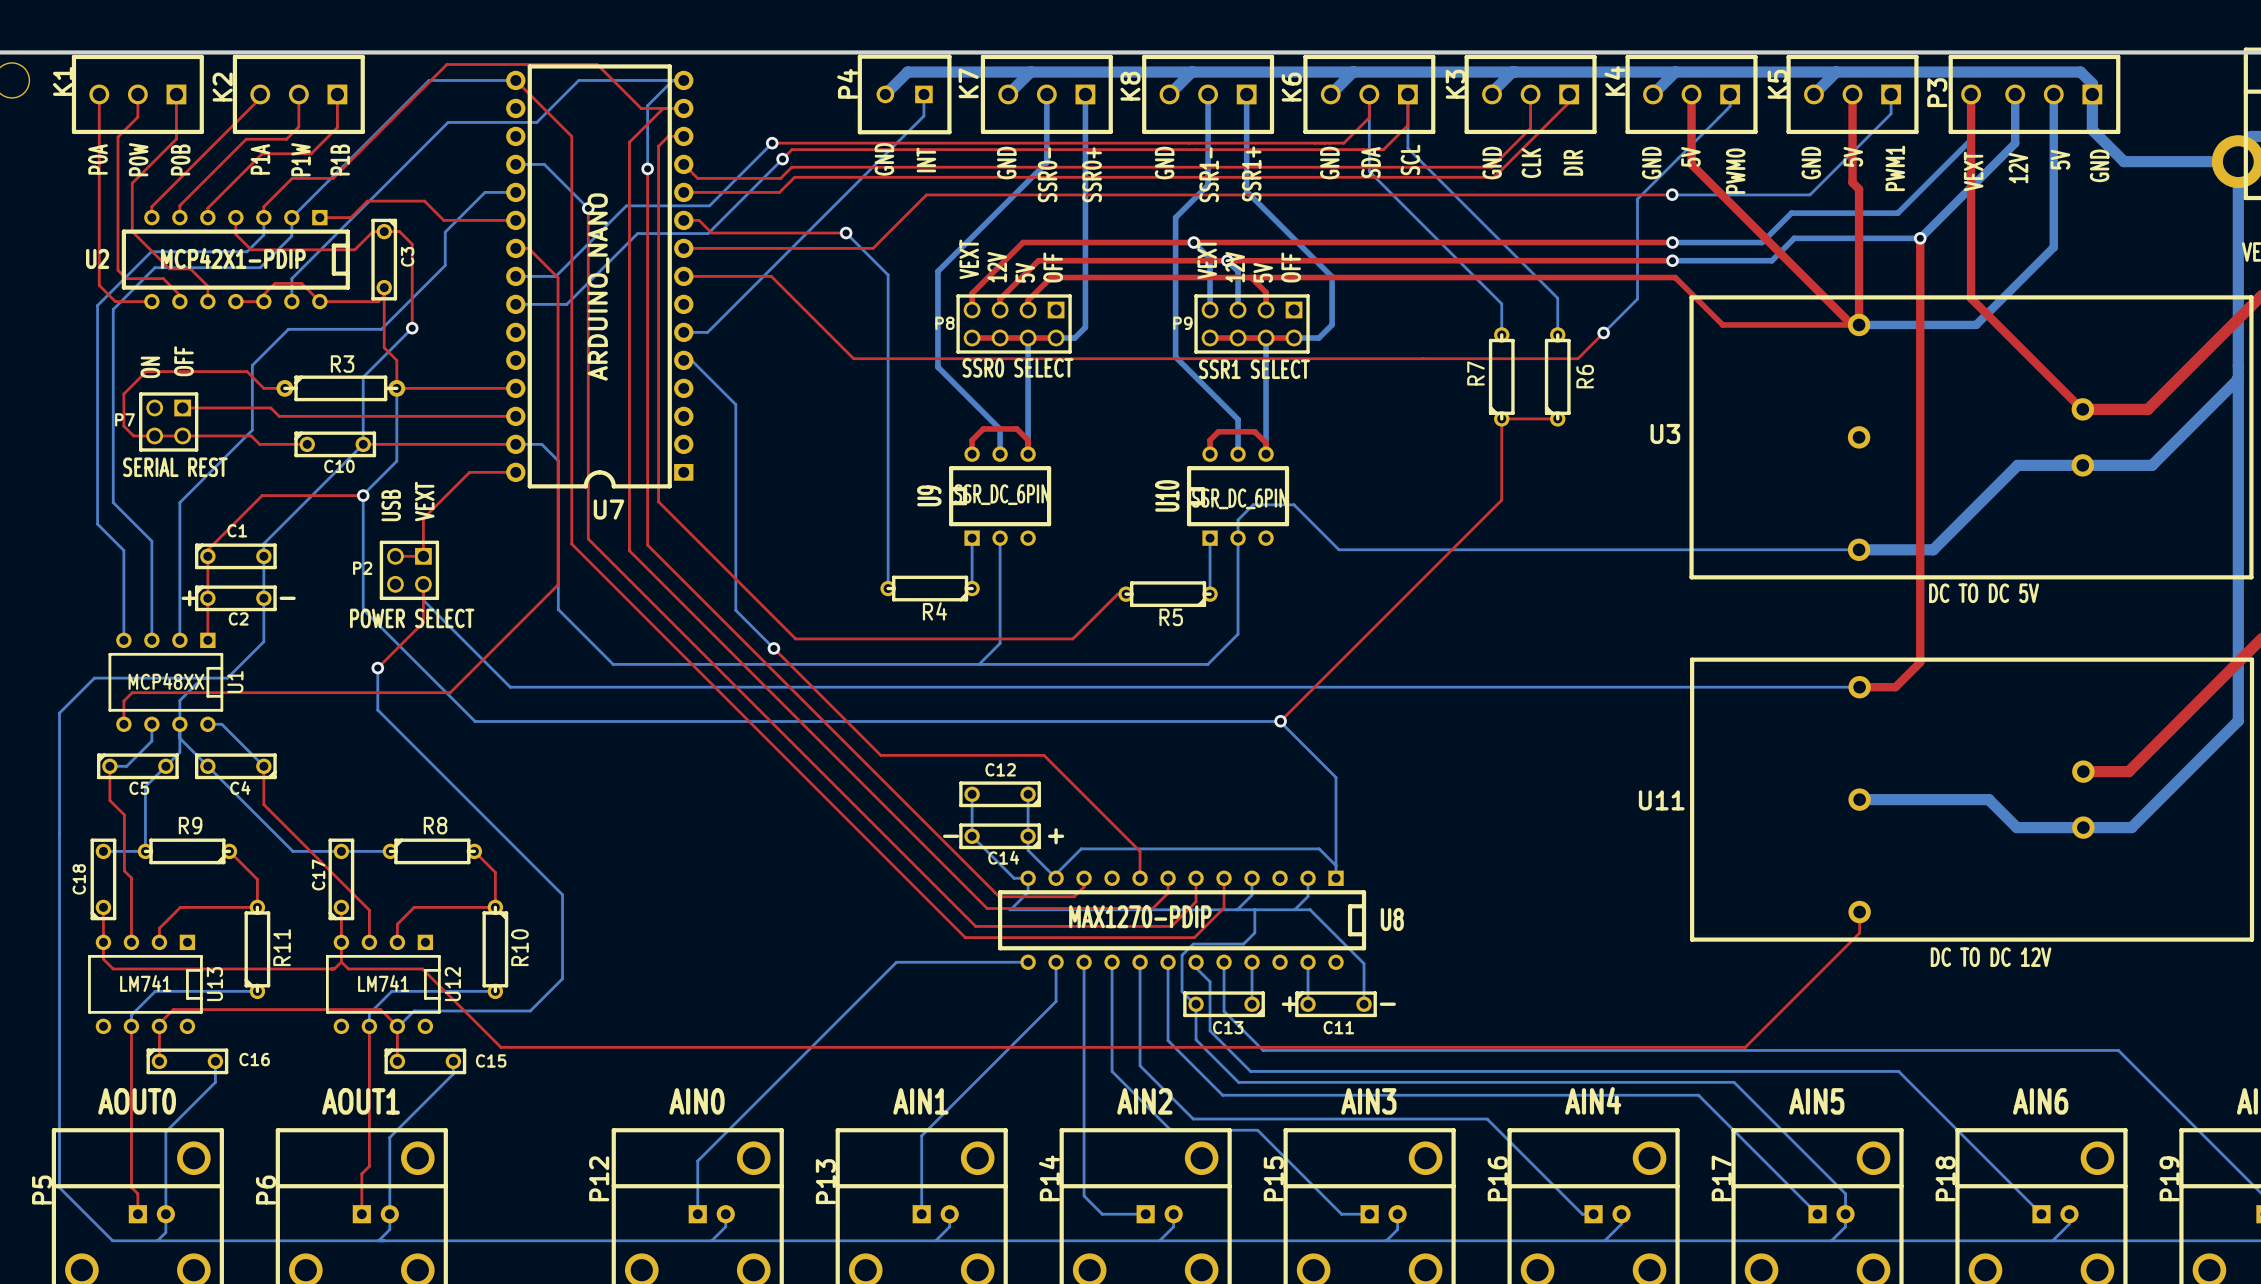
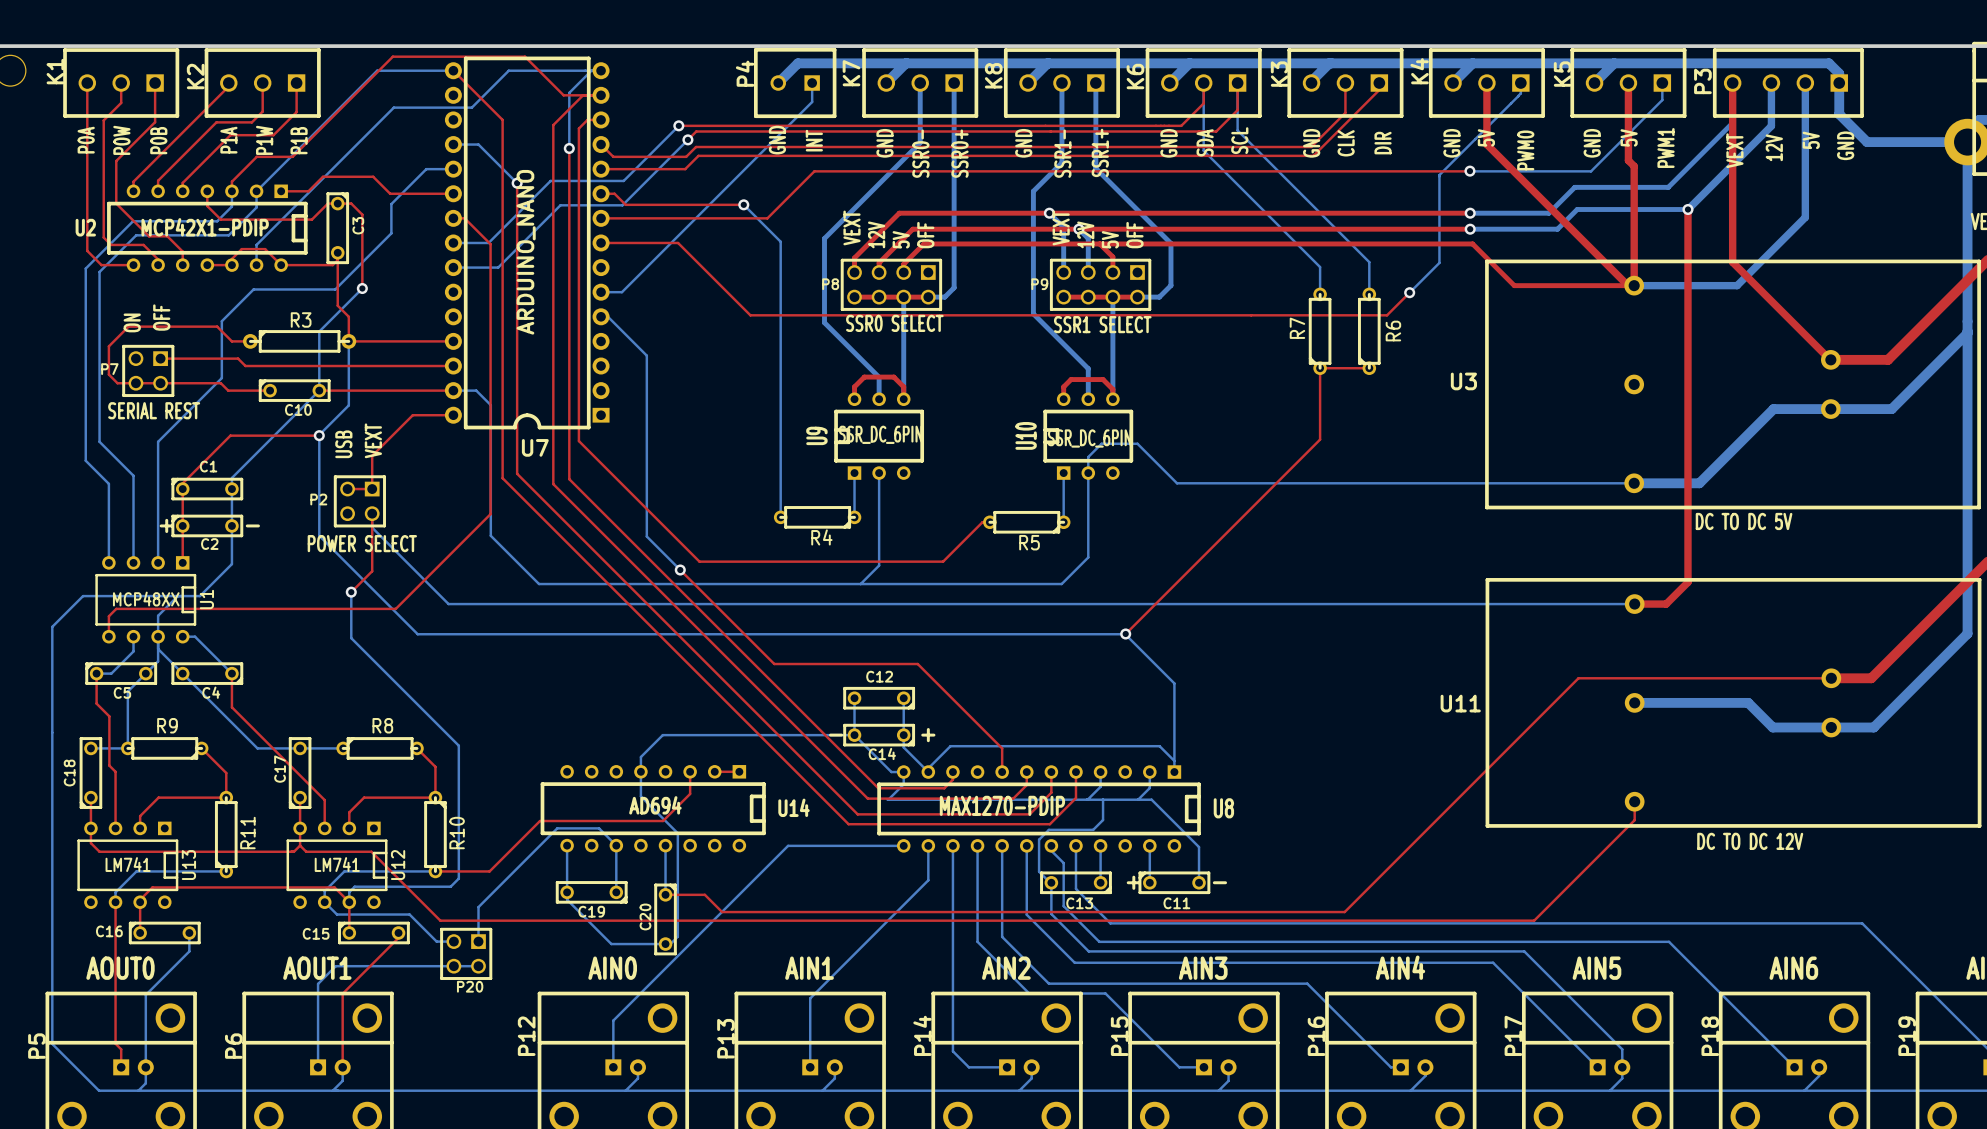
top track: (423, 622) (377, 668) -> (372, 547) (372, 571) (351, 592)
bottom track: (377, 668) (377, 710) (562, 894) (562, 978) (530, 1010) (414, 1010) (397, 1026) -> (351, 592) (351, 638) (458, 745) (458, 878) (450, 886) (354, 886) (349, 892) (349, 902)
via position: (377, 668) -> (351, 592)
top track: none -> (1831, 678) (1578, 678) (1344, 912) (722, 912) (704, 894) (665, 894)
bottom track: none -> (854, 735) (662, 735) (640, 757) (640, 796) (677, 833) (677, 936) (670, 944) (611, 944) (567, 899) (567, 845)
top track: none -> (690, 771) (690, 793) (663, 821) (540, 821) (489, 871) (435, 871)
top track: none -> (714, 771) (739, 771)
U14: none -> AD694 (653, 808)
bottom track: none -> (665, 845) (665, 894)
C19: none -> (591, 892)
bottom track: none -> (616, 892) (616, 845) (599, 828) (557, 828) (478, 907) (478, 941)
bottom track: none -> (324, 902) (337, 914) (409, 914) (436, 941) (453, 941)
top track: (369, 1026) (369, 1166) (361, 1173) (361, 1214) -> none
C20: none -> (665, 919)
C16 name position: C16 (254, 1059) -> C16 (109, 931)
C15 name position: C15 (491, 1060) -> C15 (316, 933)
bottom track: (453, 1061) (453, 1073) (389, 1137) (389, 1214) -> none
top track: none -> (398, 932) (398, 937) (342, 993) (342, 1067)
P20: none -> (466, 953)
bottom track: none -> (478, 966) (335, 966) (318, 983) (318, 1067)

